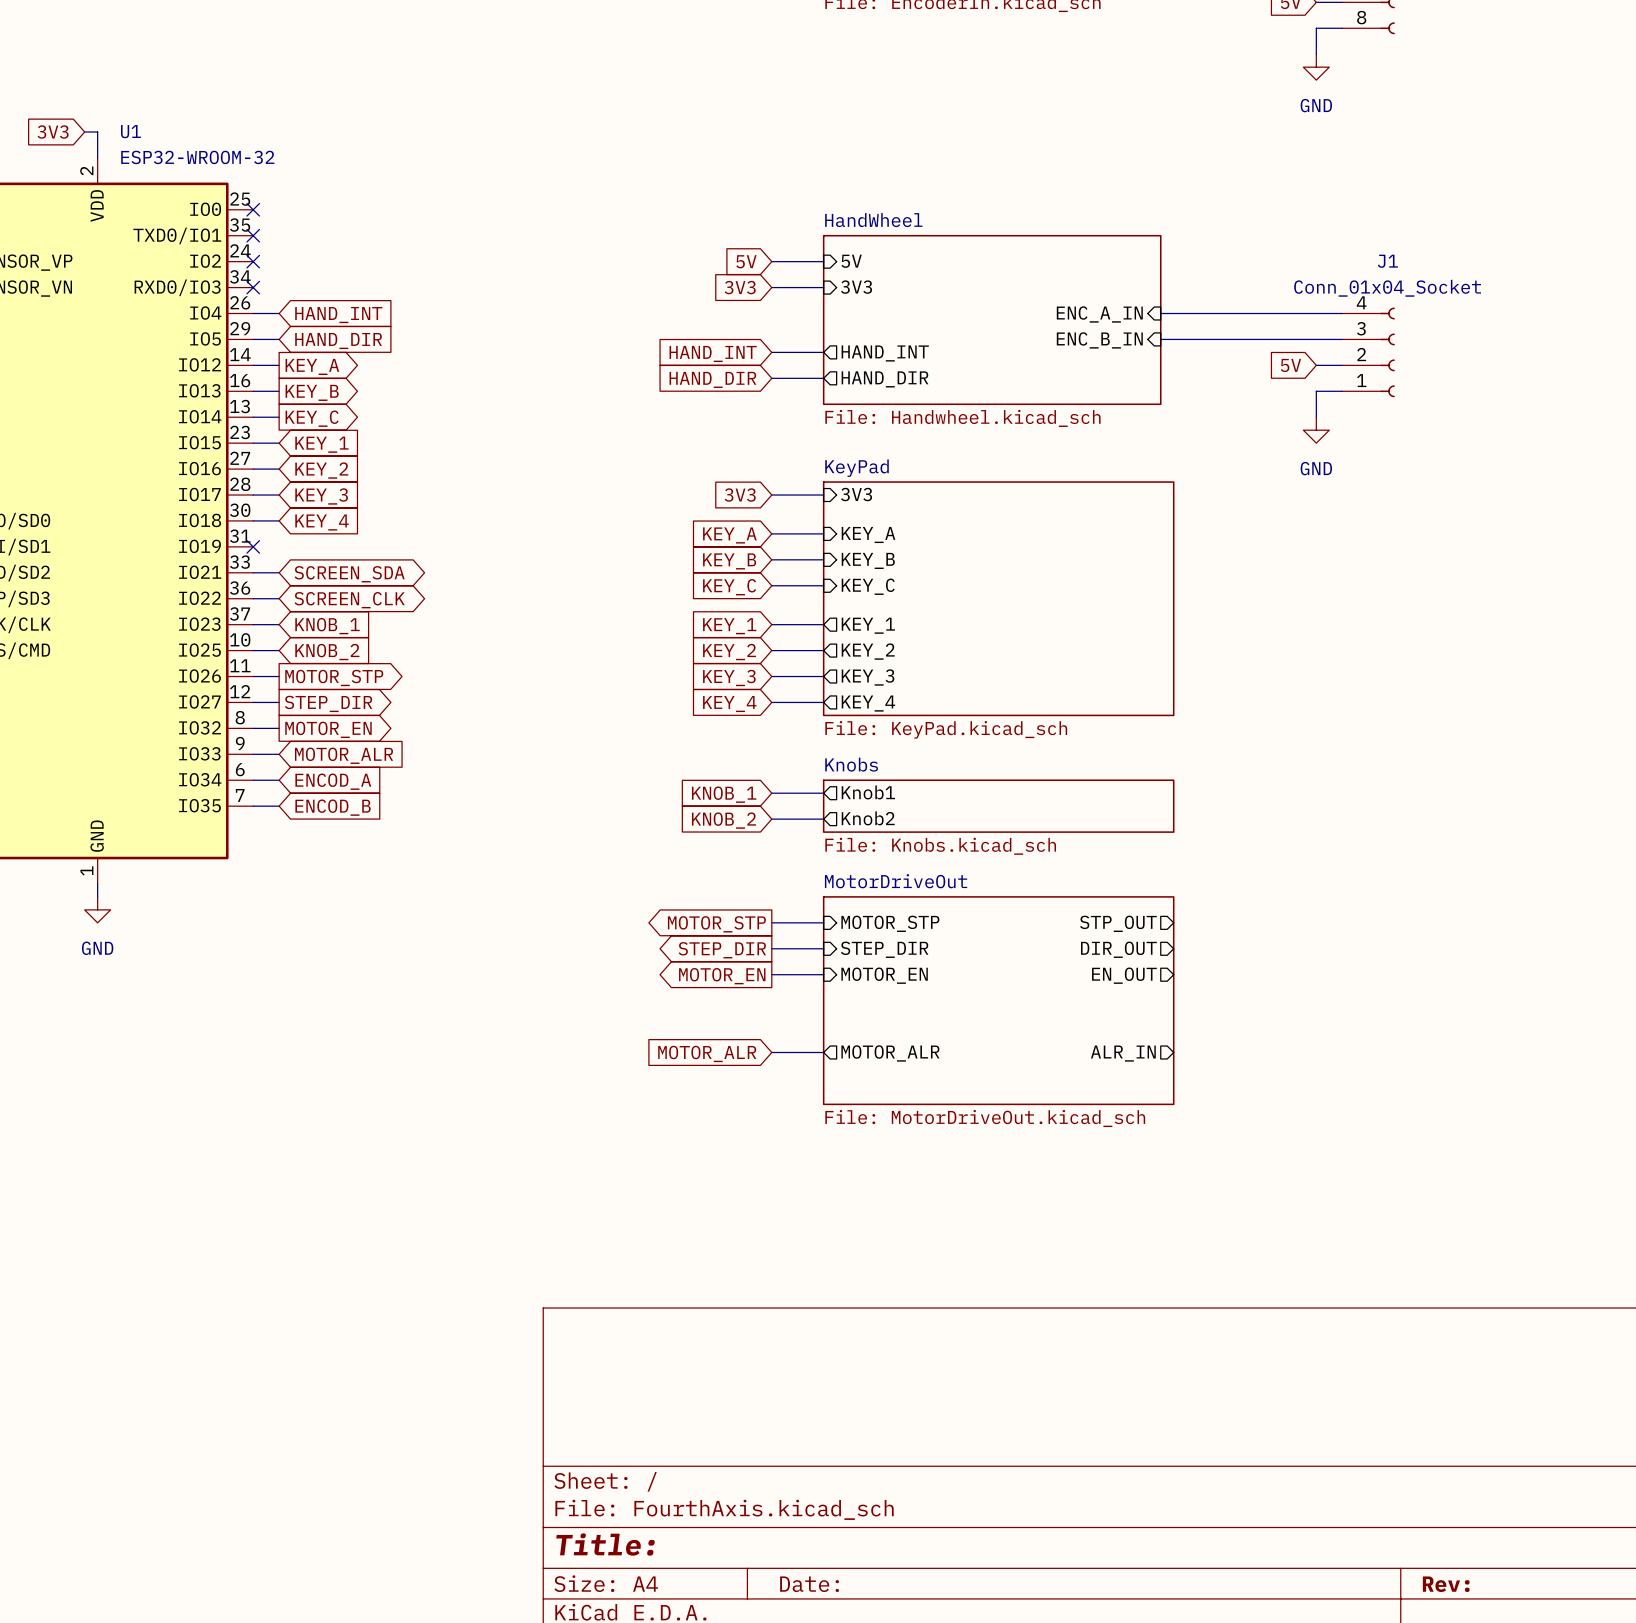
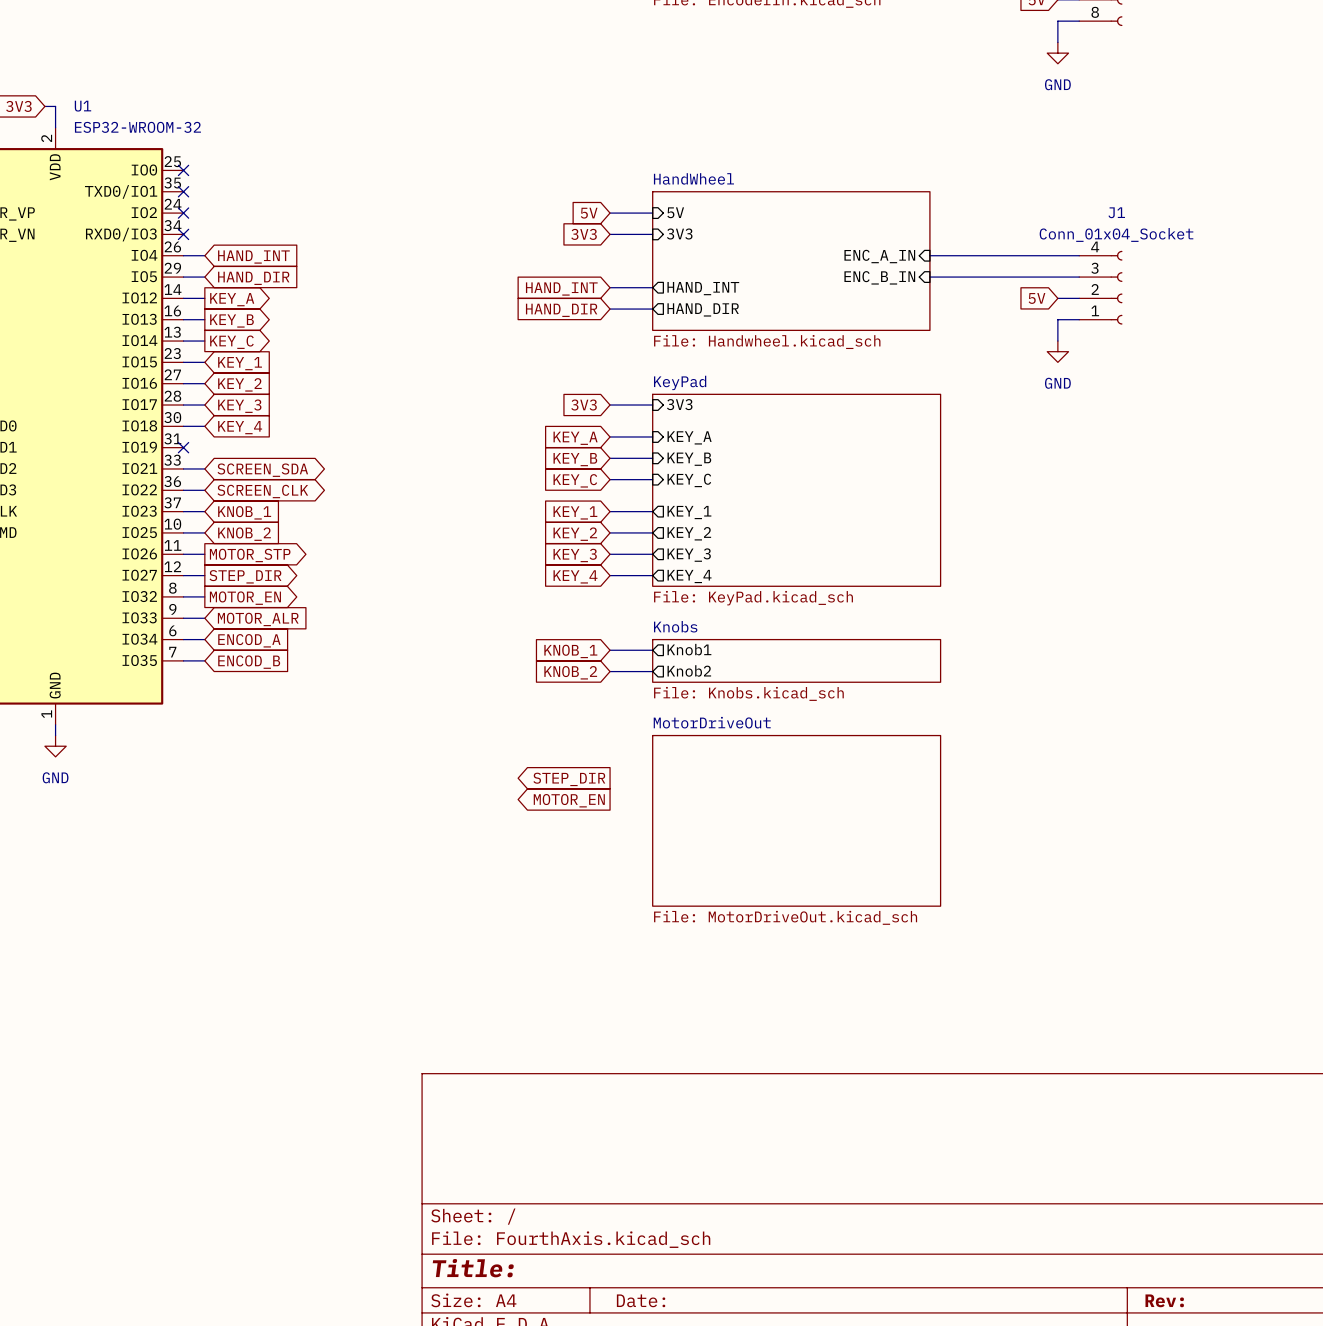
wire: (771, 922) (823, 922) -> none
sheet pin: MOTOR_STP (890, 923) -> none
sheet pin: STP_OUT (1118, 923) -> none
global label: MOTOR_STP (716, 924) -> none
wire: (771, 948) (823, 948) -> none
sheet pin: STEP_DIR (884, 949) -> none
sheet pin: DIR_OUT (1118, 949) -> none
wire: (771, 974) (823, 974) -> none
sheet pin: MOTOR_EN (884, 975) -> none
sheet pin: EN_OUT (1124, 975) -> none
wire: (771, 1052) (823, 1052) -> none
global label: MOTOR_ALR (707, 1053) -> none
sheet pin: MOTOR_ALR (890, 1053) -> none
sheet pin: ALR_IN (1123, 1053) -> none

